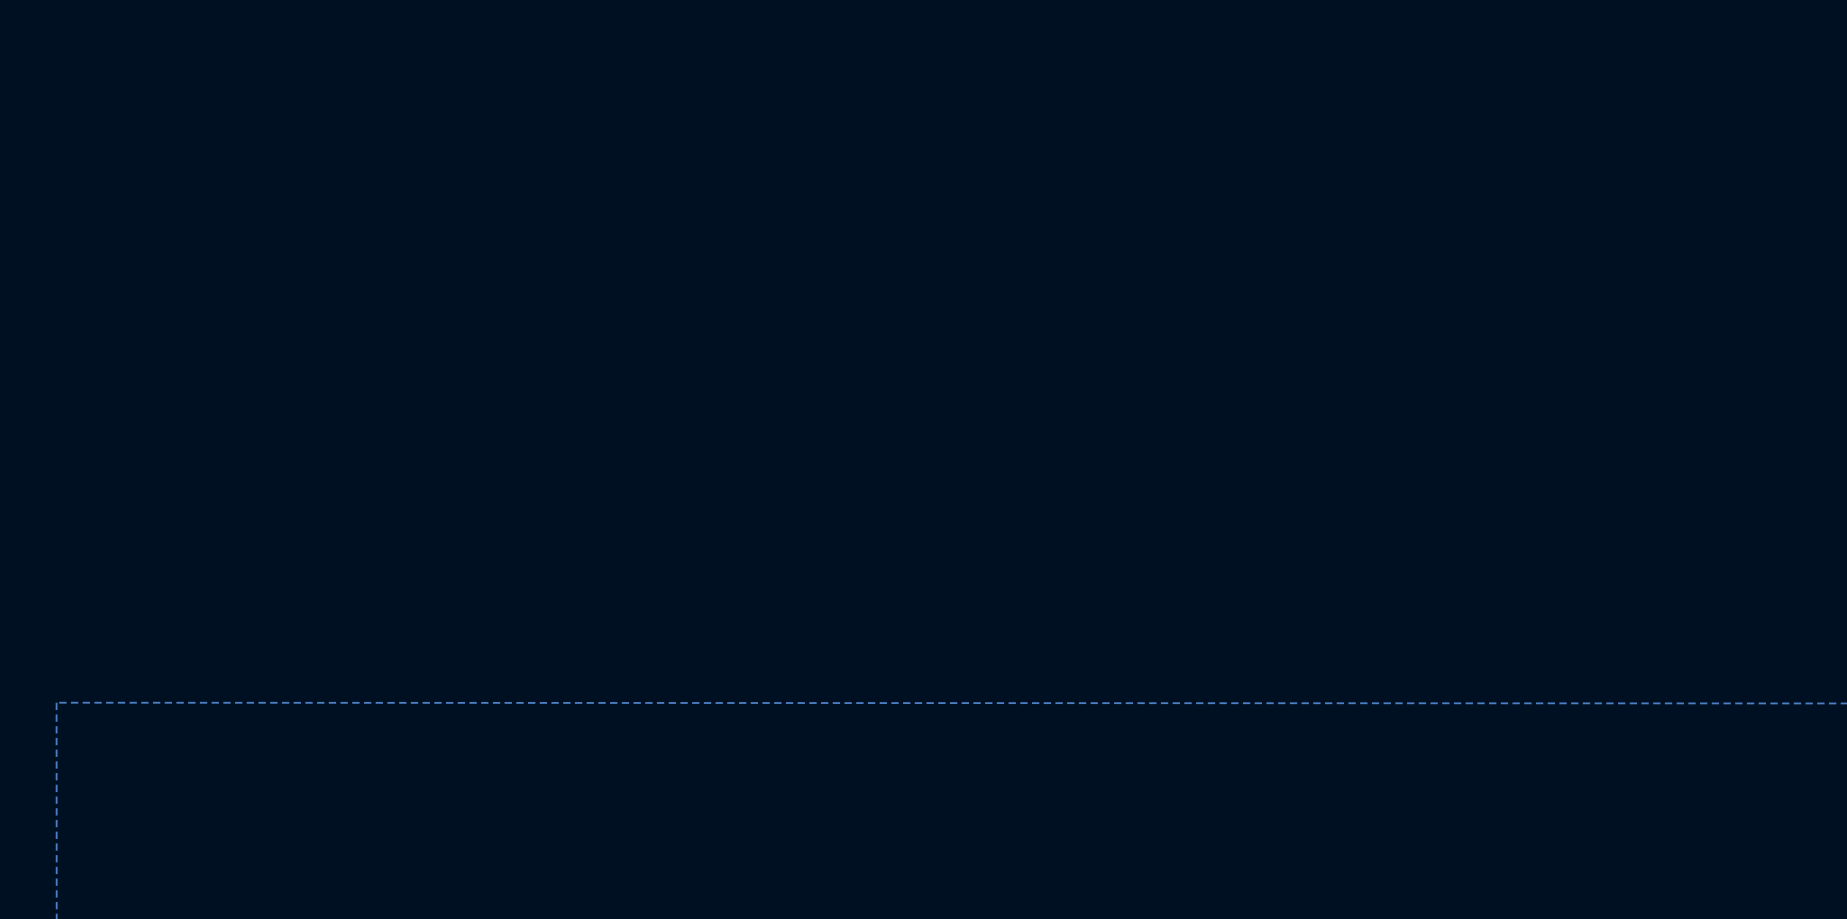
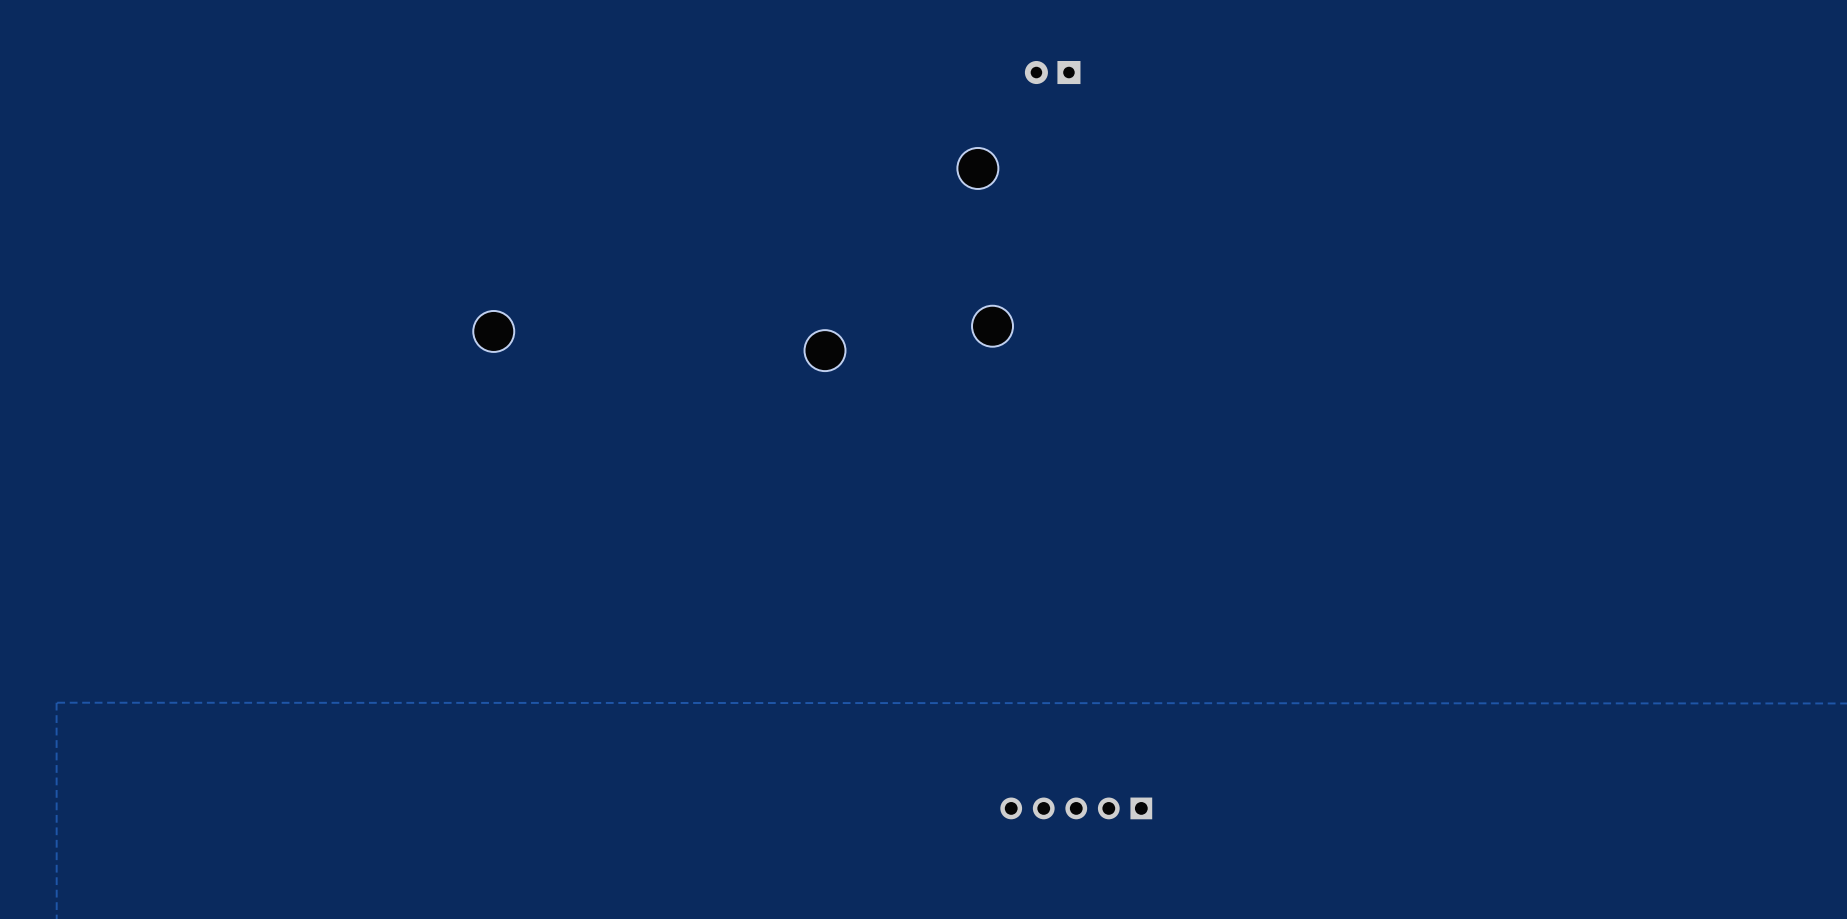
part: none -> (1052, 72)
part: none -> (977, 168)
part: none -> (992, 326)
part: none -> (493, 331)
part: none -> (825, 350)
part: none -> (1076, 808)

